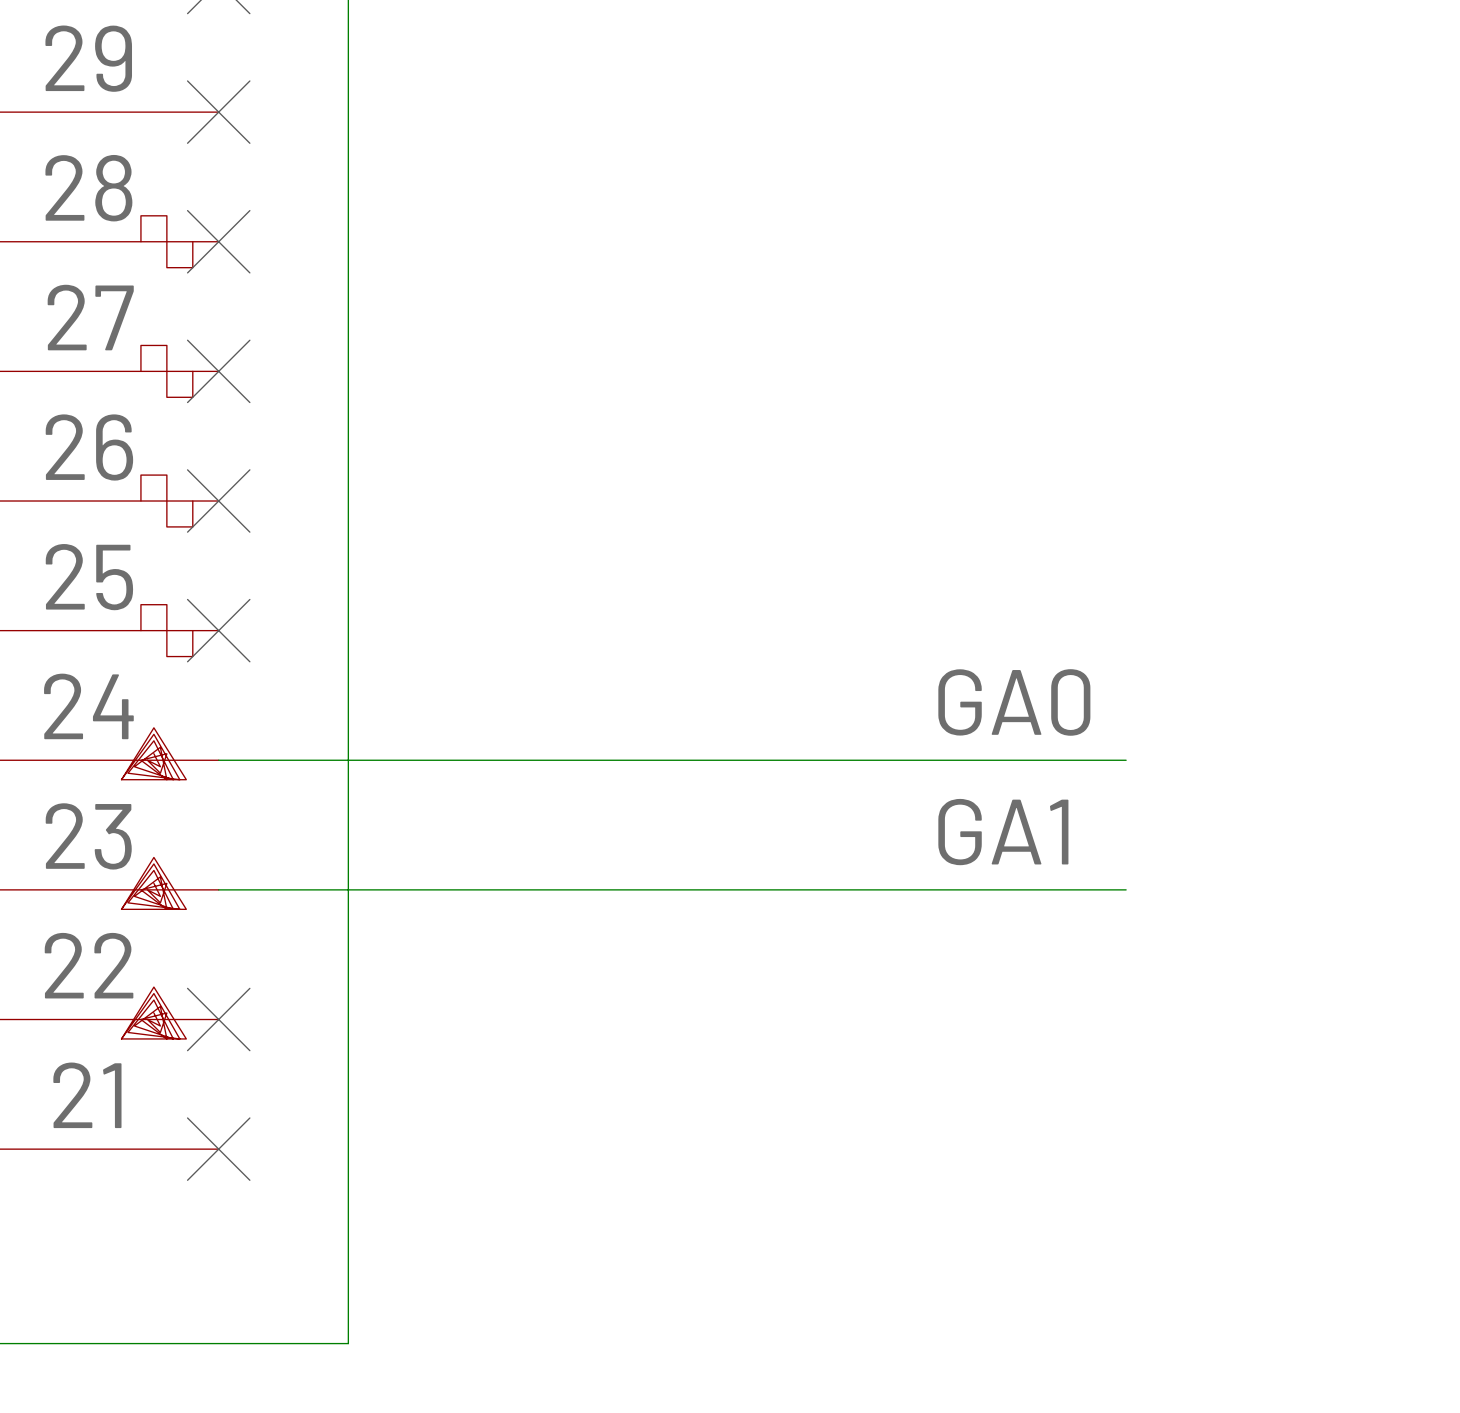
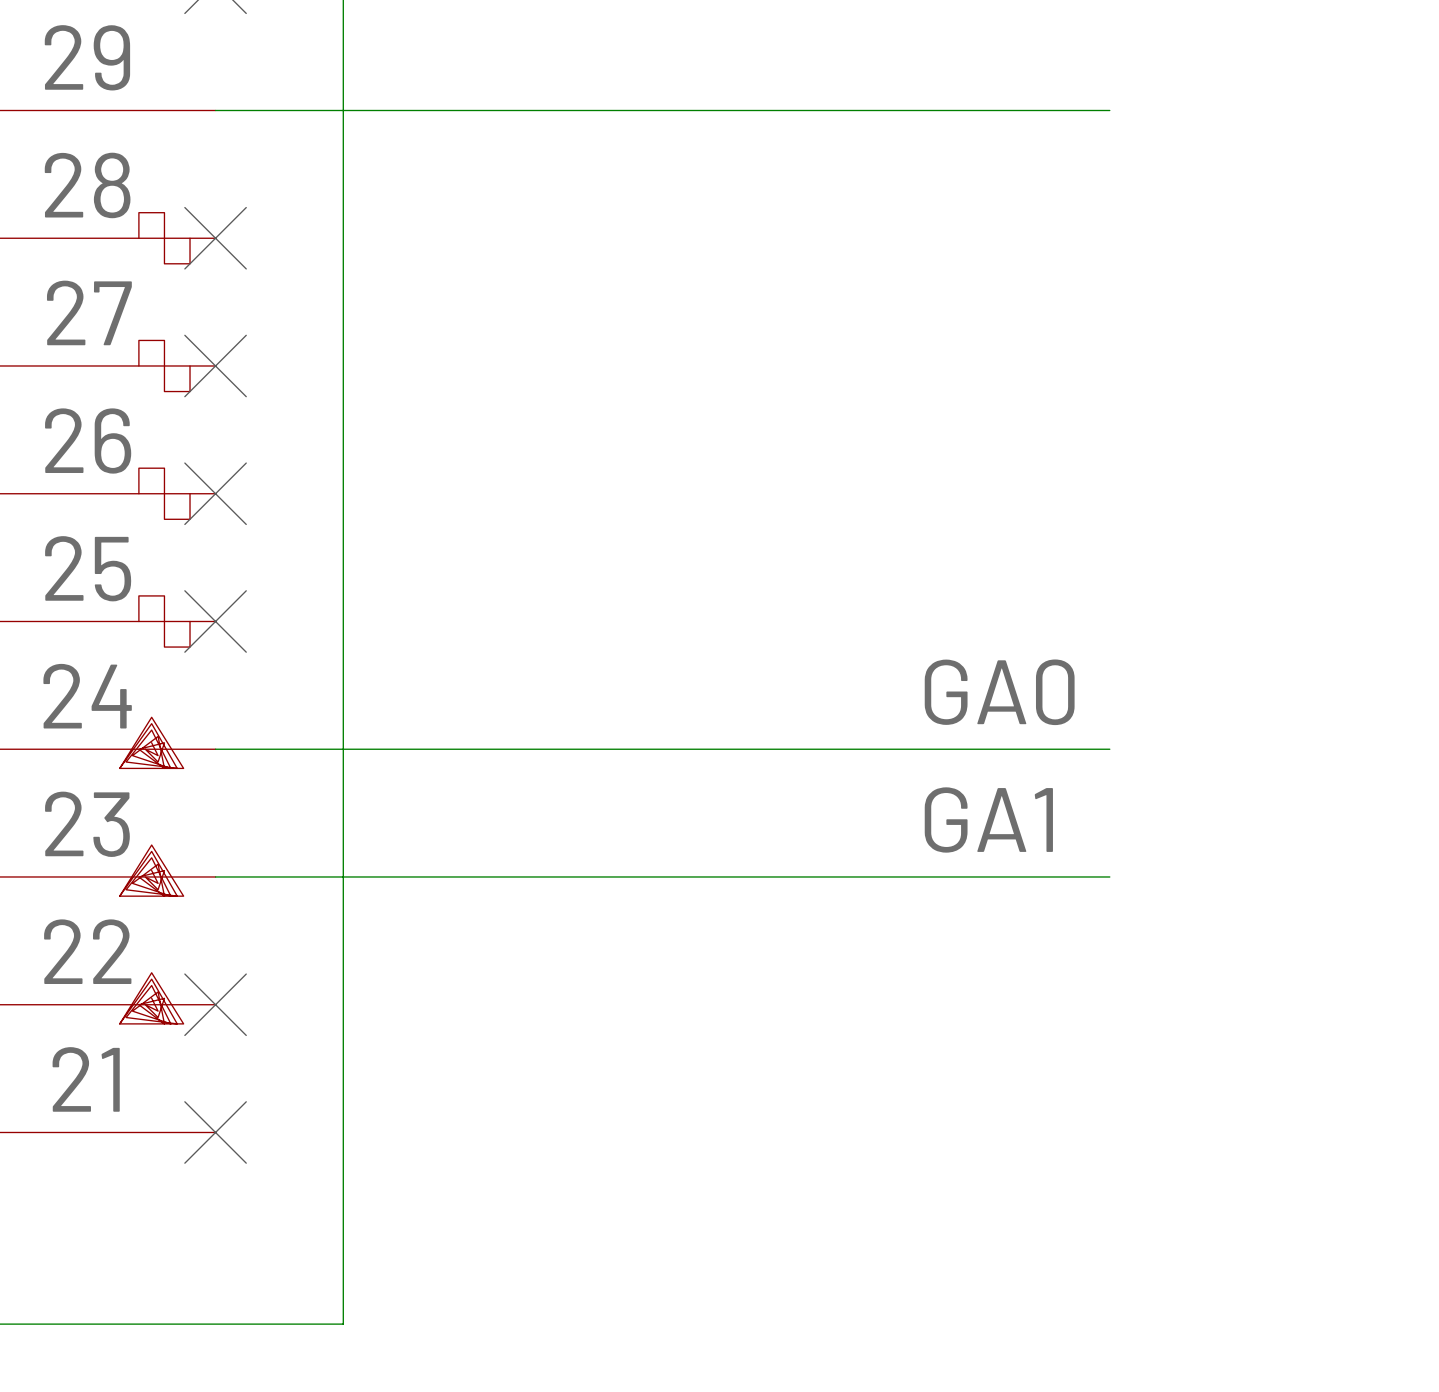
wire: none -> (215, 110) (1109, 110)
no-connect mark: (218, 112) -> none

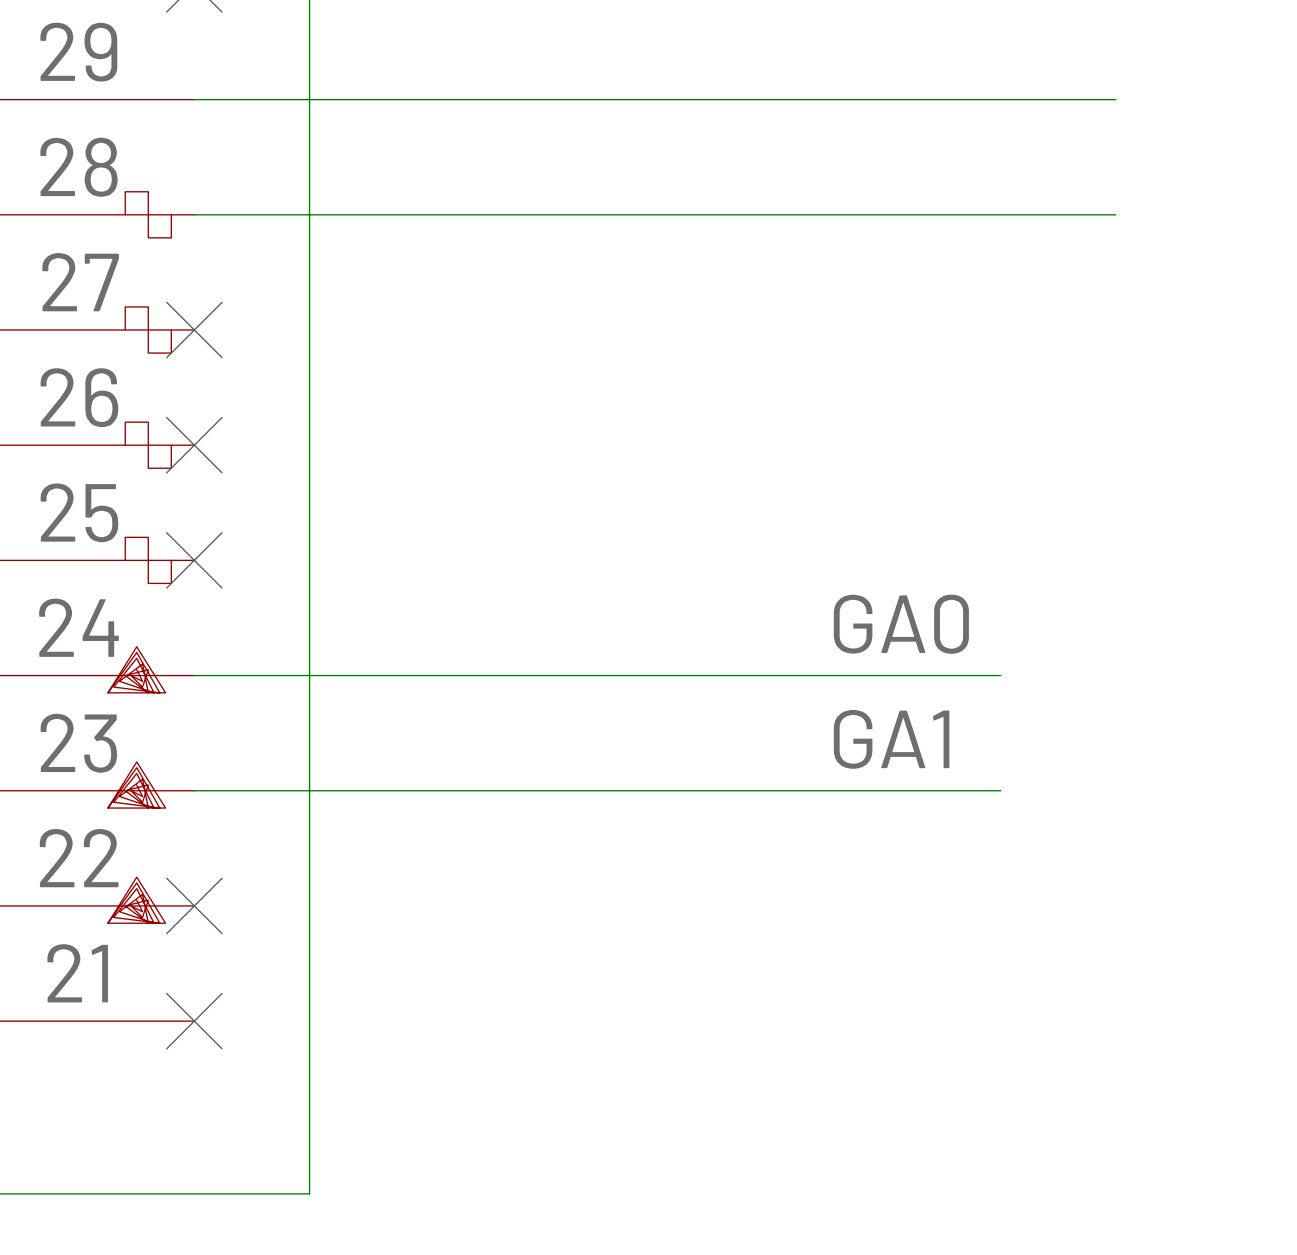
wire: none -> (1000, 99) (1115, 99)
wire: none -> (194, 214) (1115, 214)
no-connect mark: (215, 238) -> none

